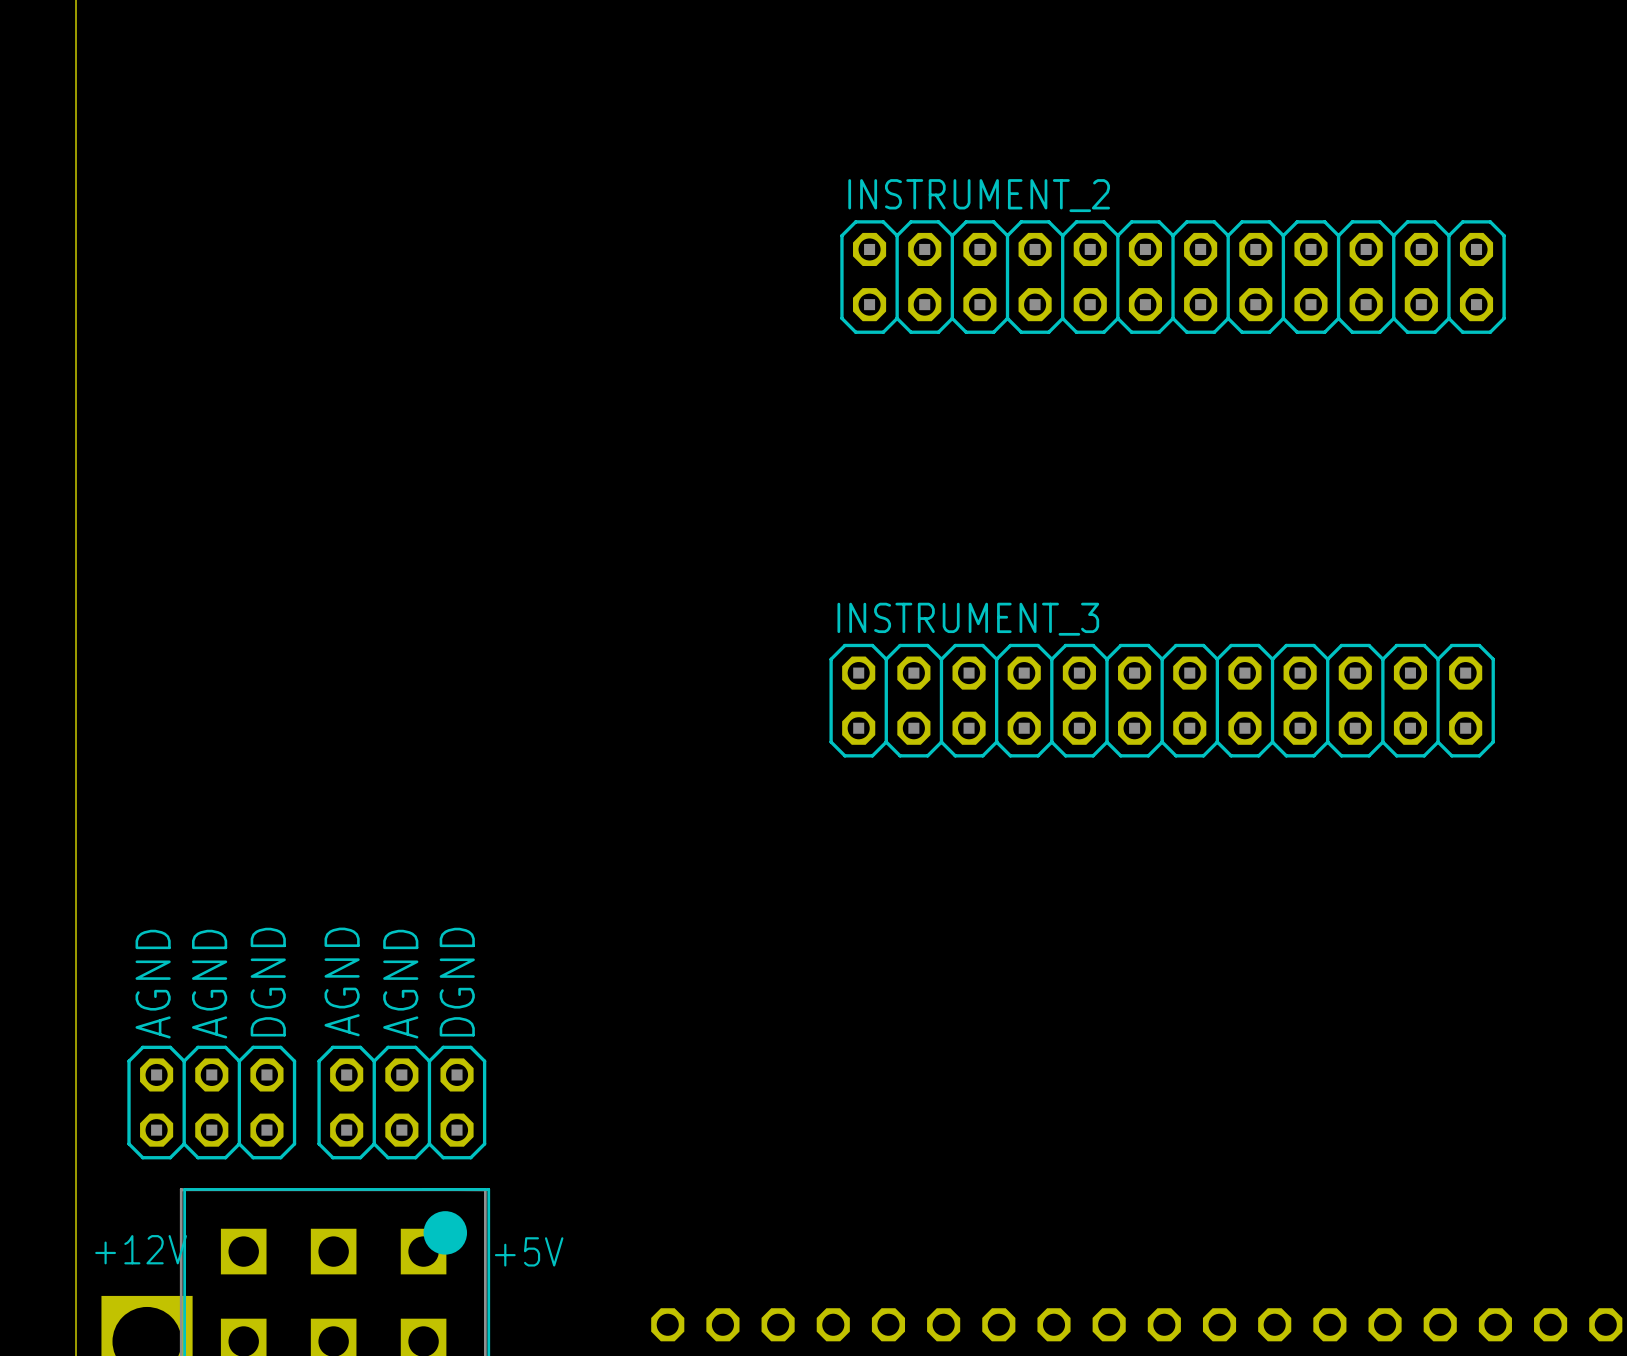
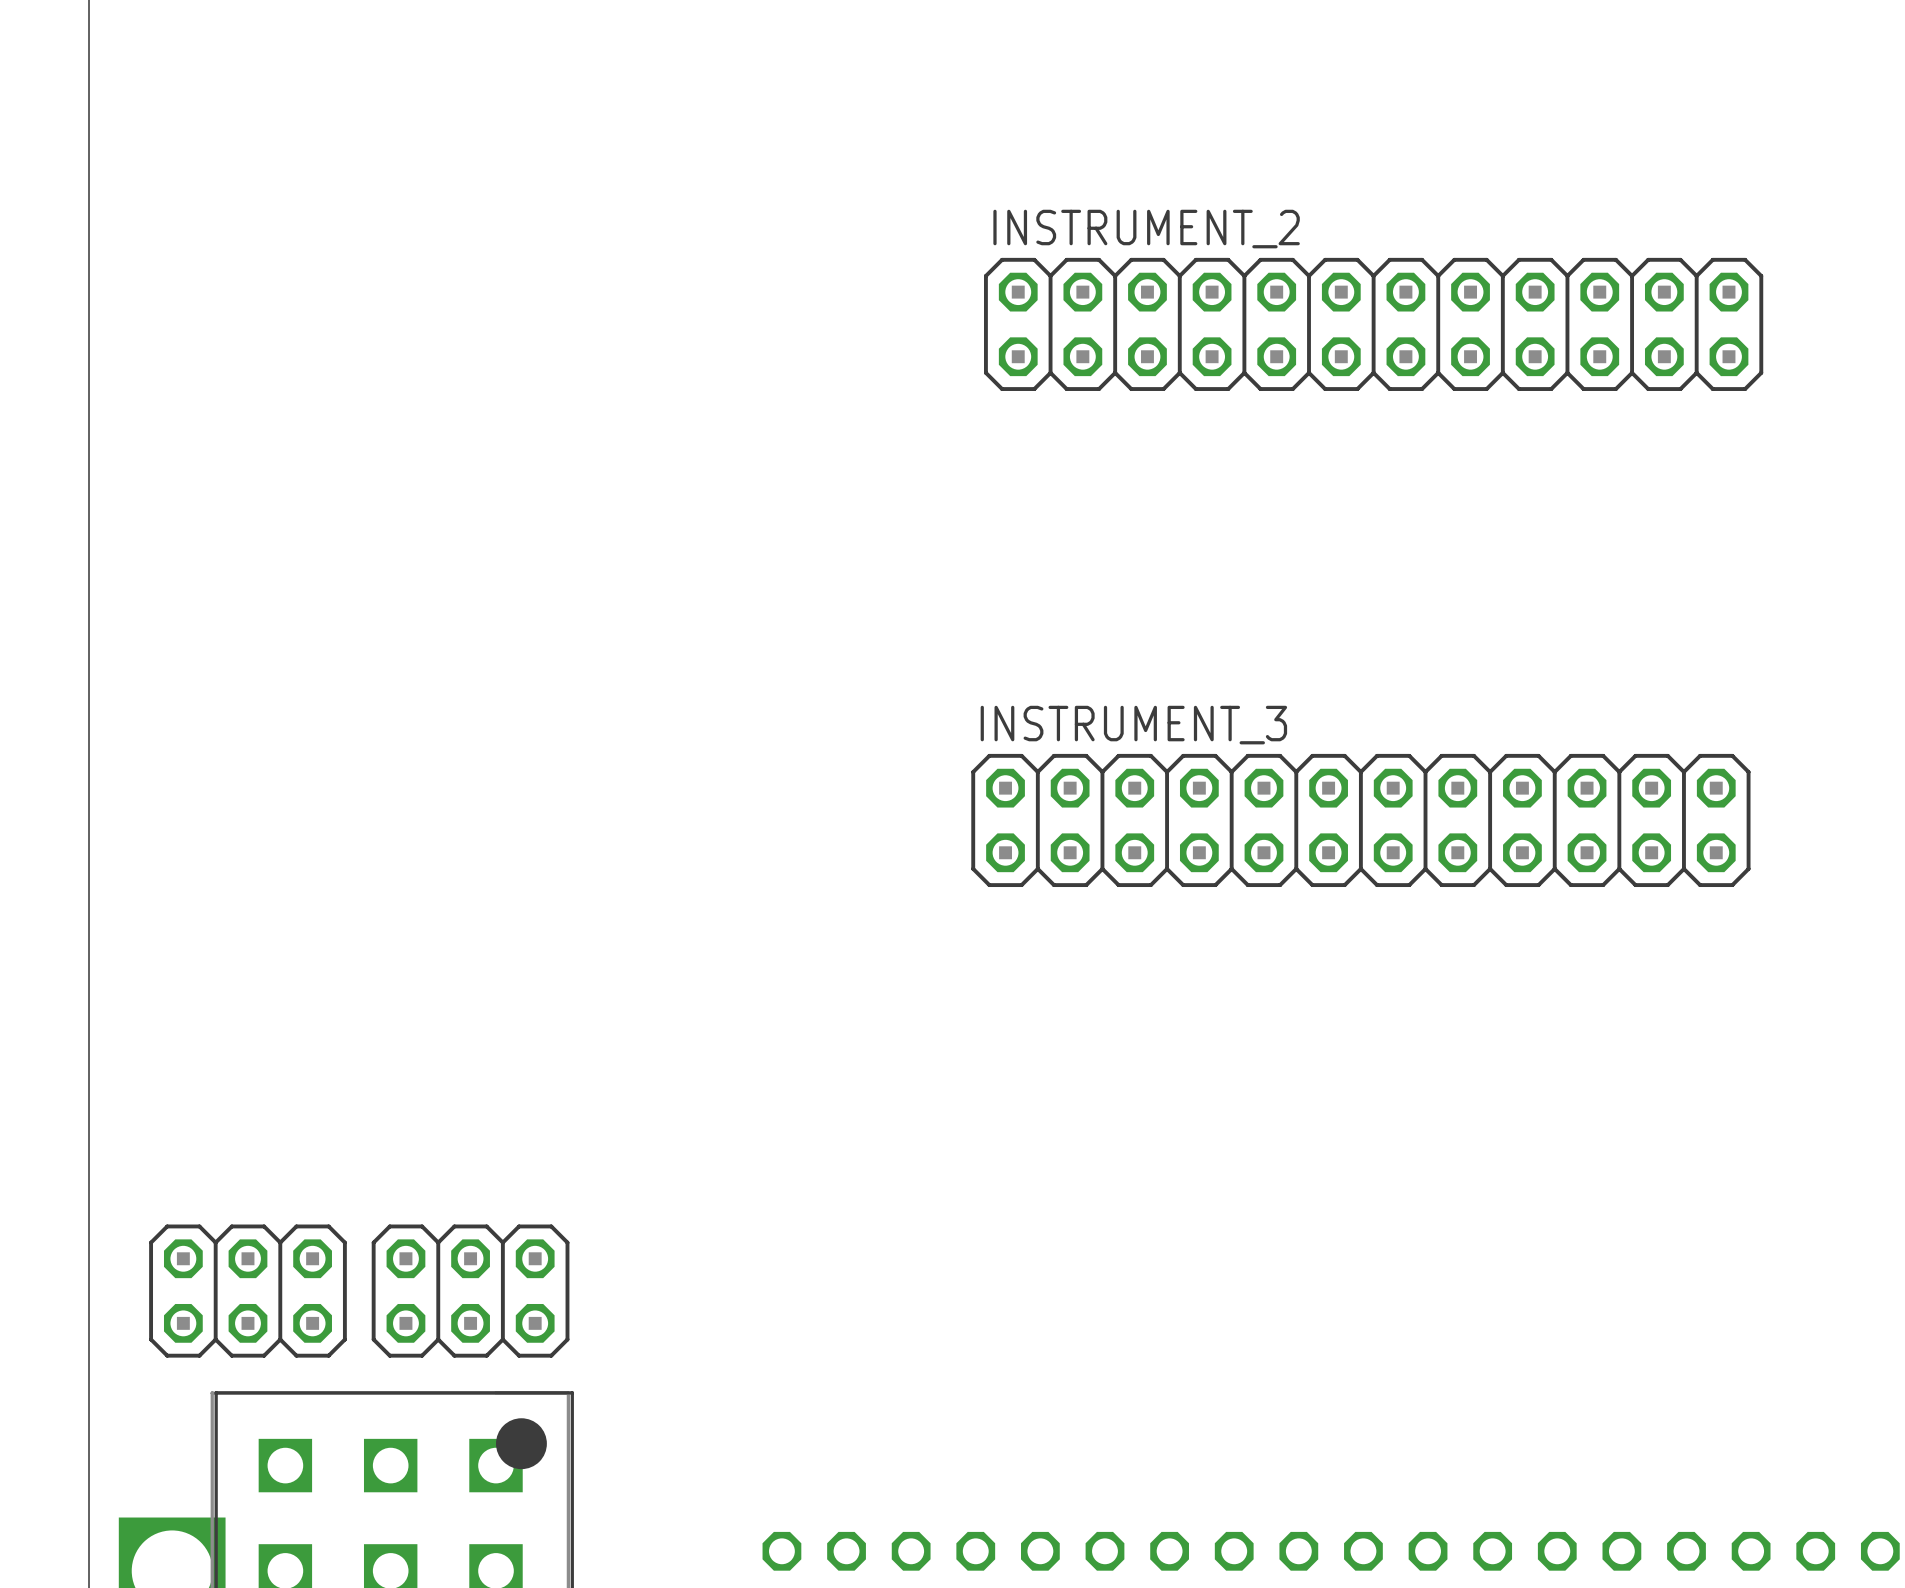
text: AGND (342, 981) -> none
text: DGND (268, 982) -> none
text: DGND (457, 982) -> none
text: AGND (153, 984) -> none
text: AGND (209, 984) -> none
text: AGND (400, 984) -> none
text: +12V (141, 1249) -> none
text: +5V (529, 1251) -> none

